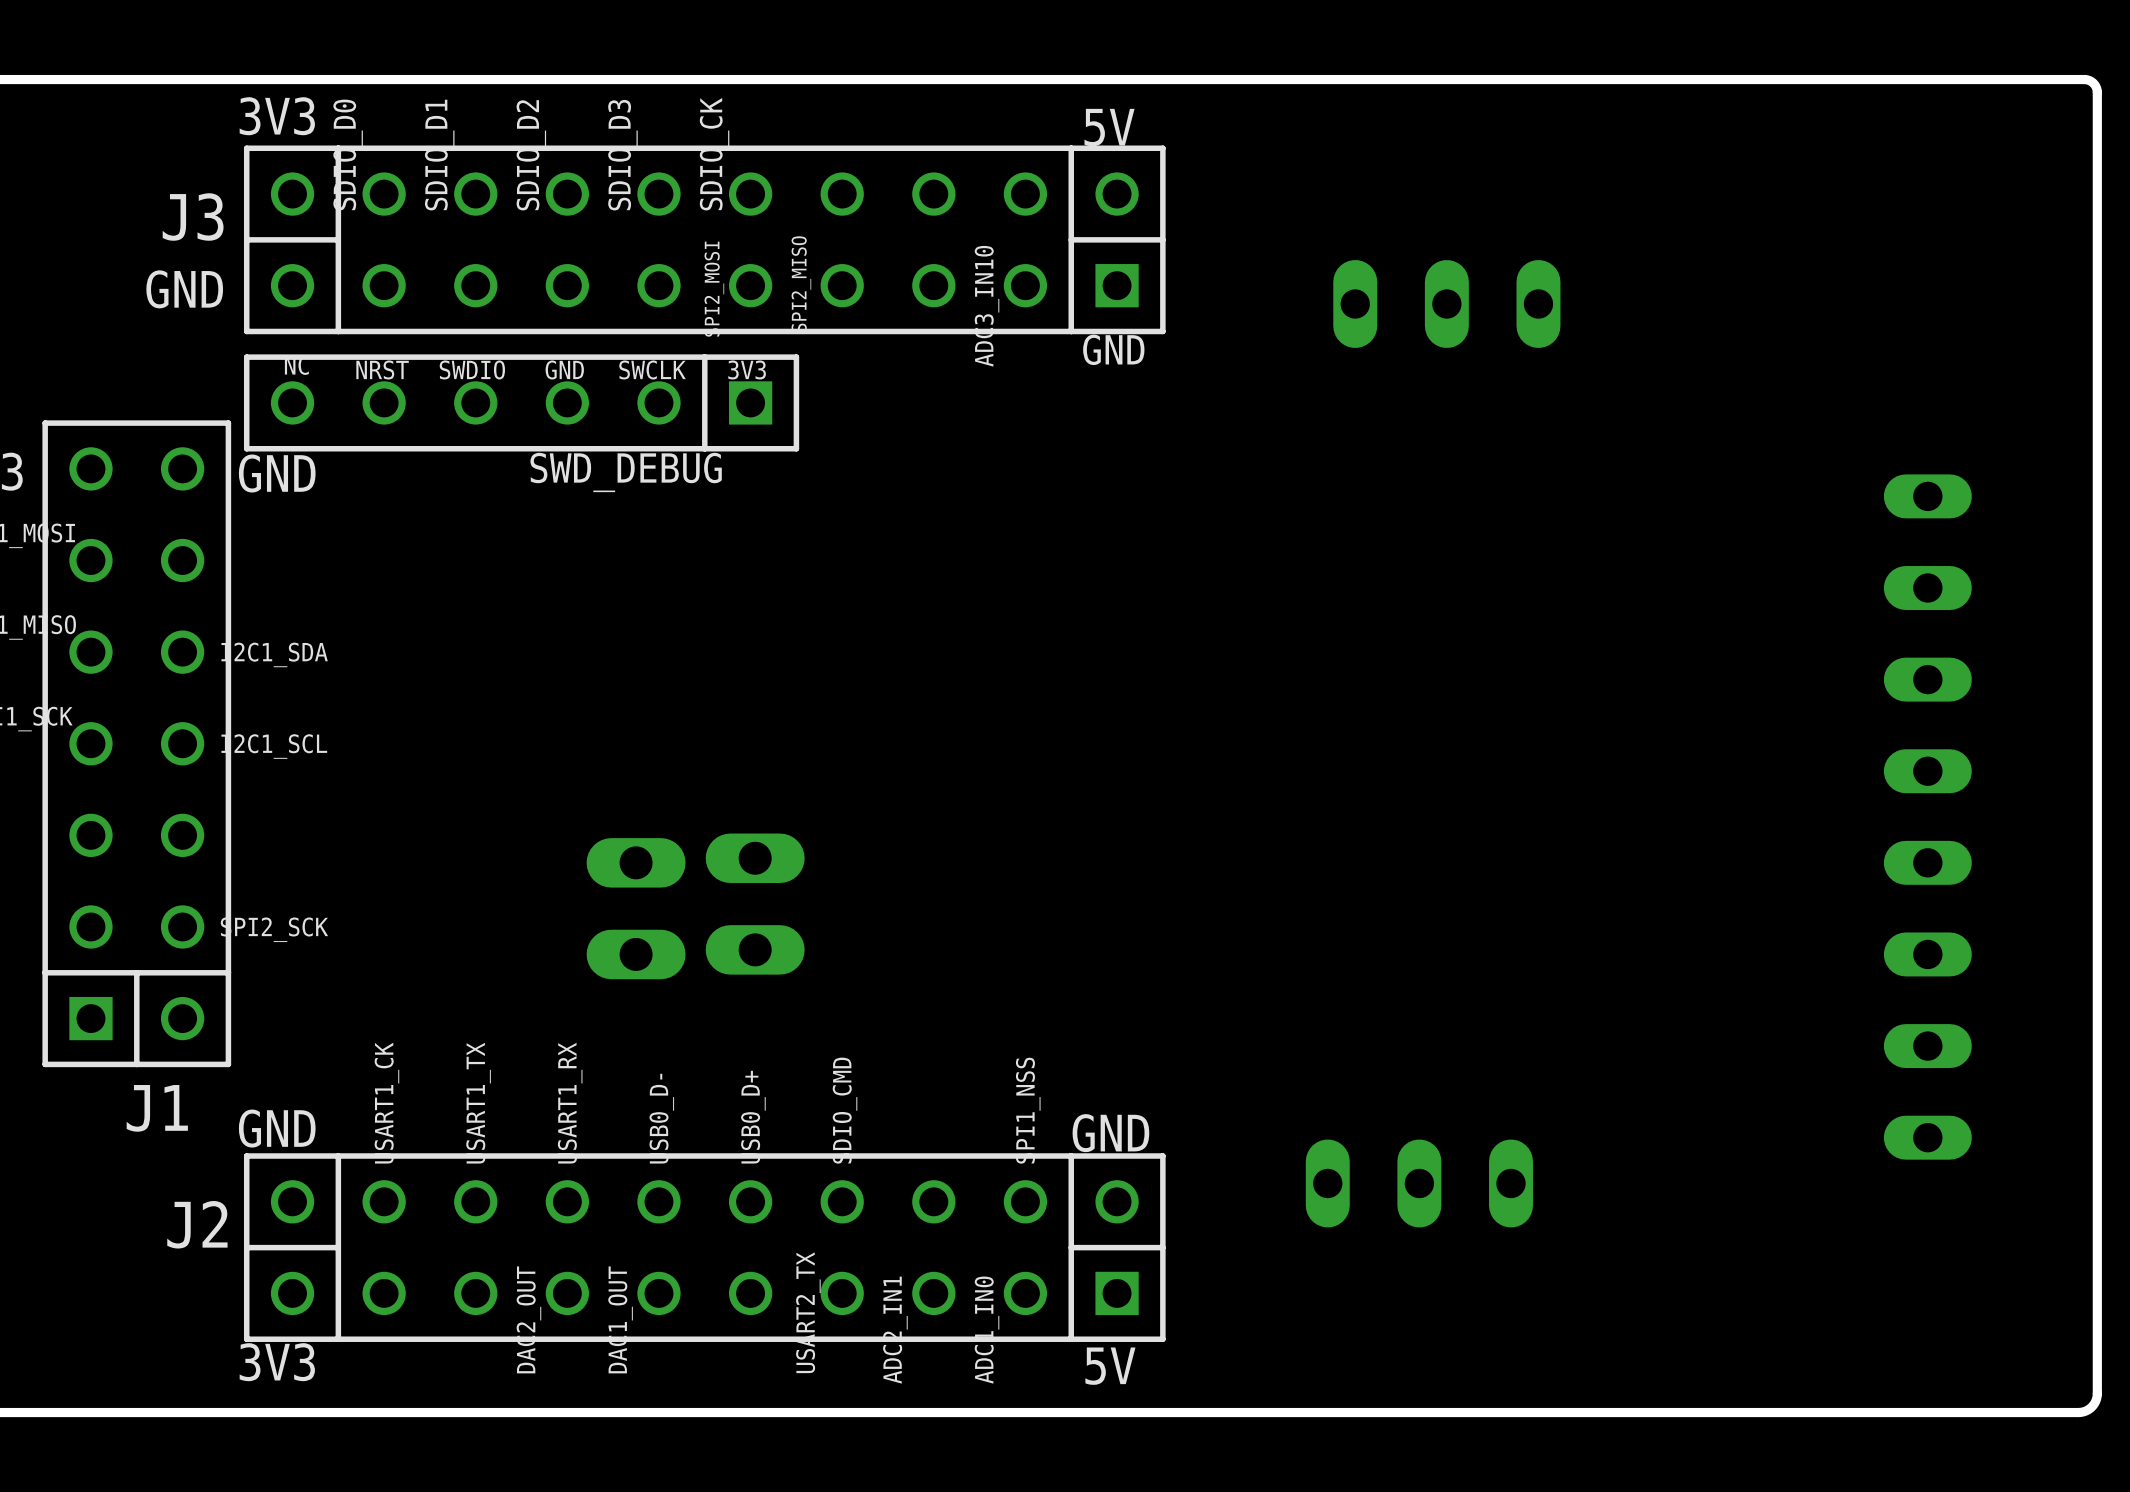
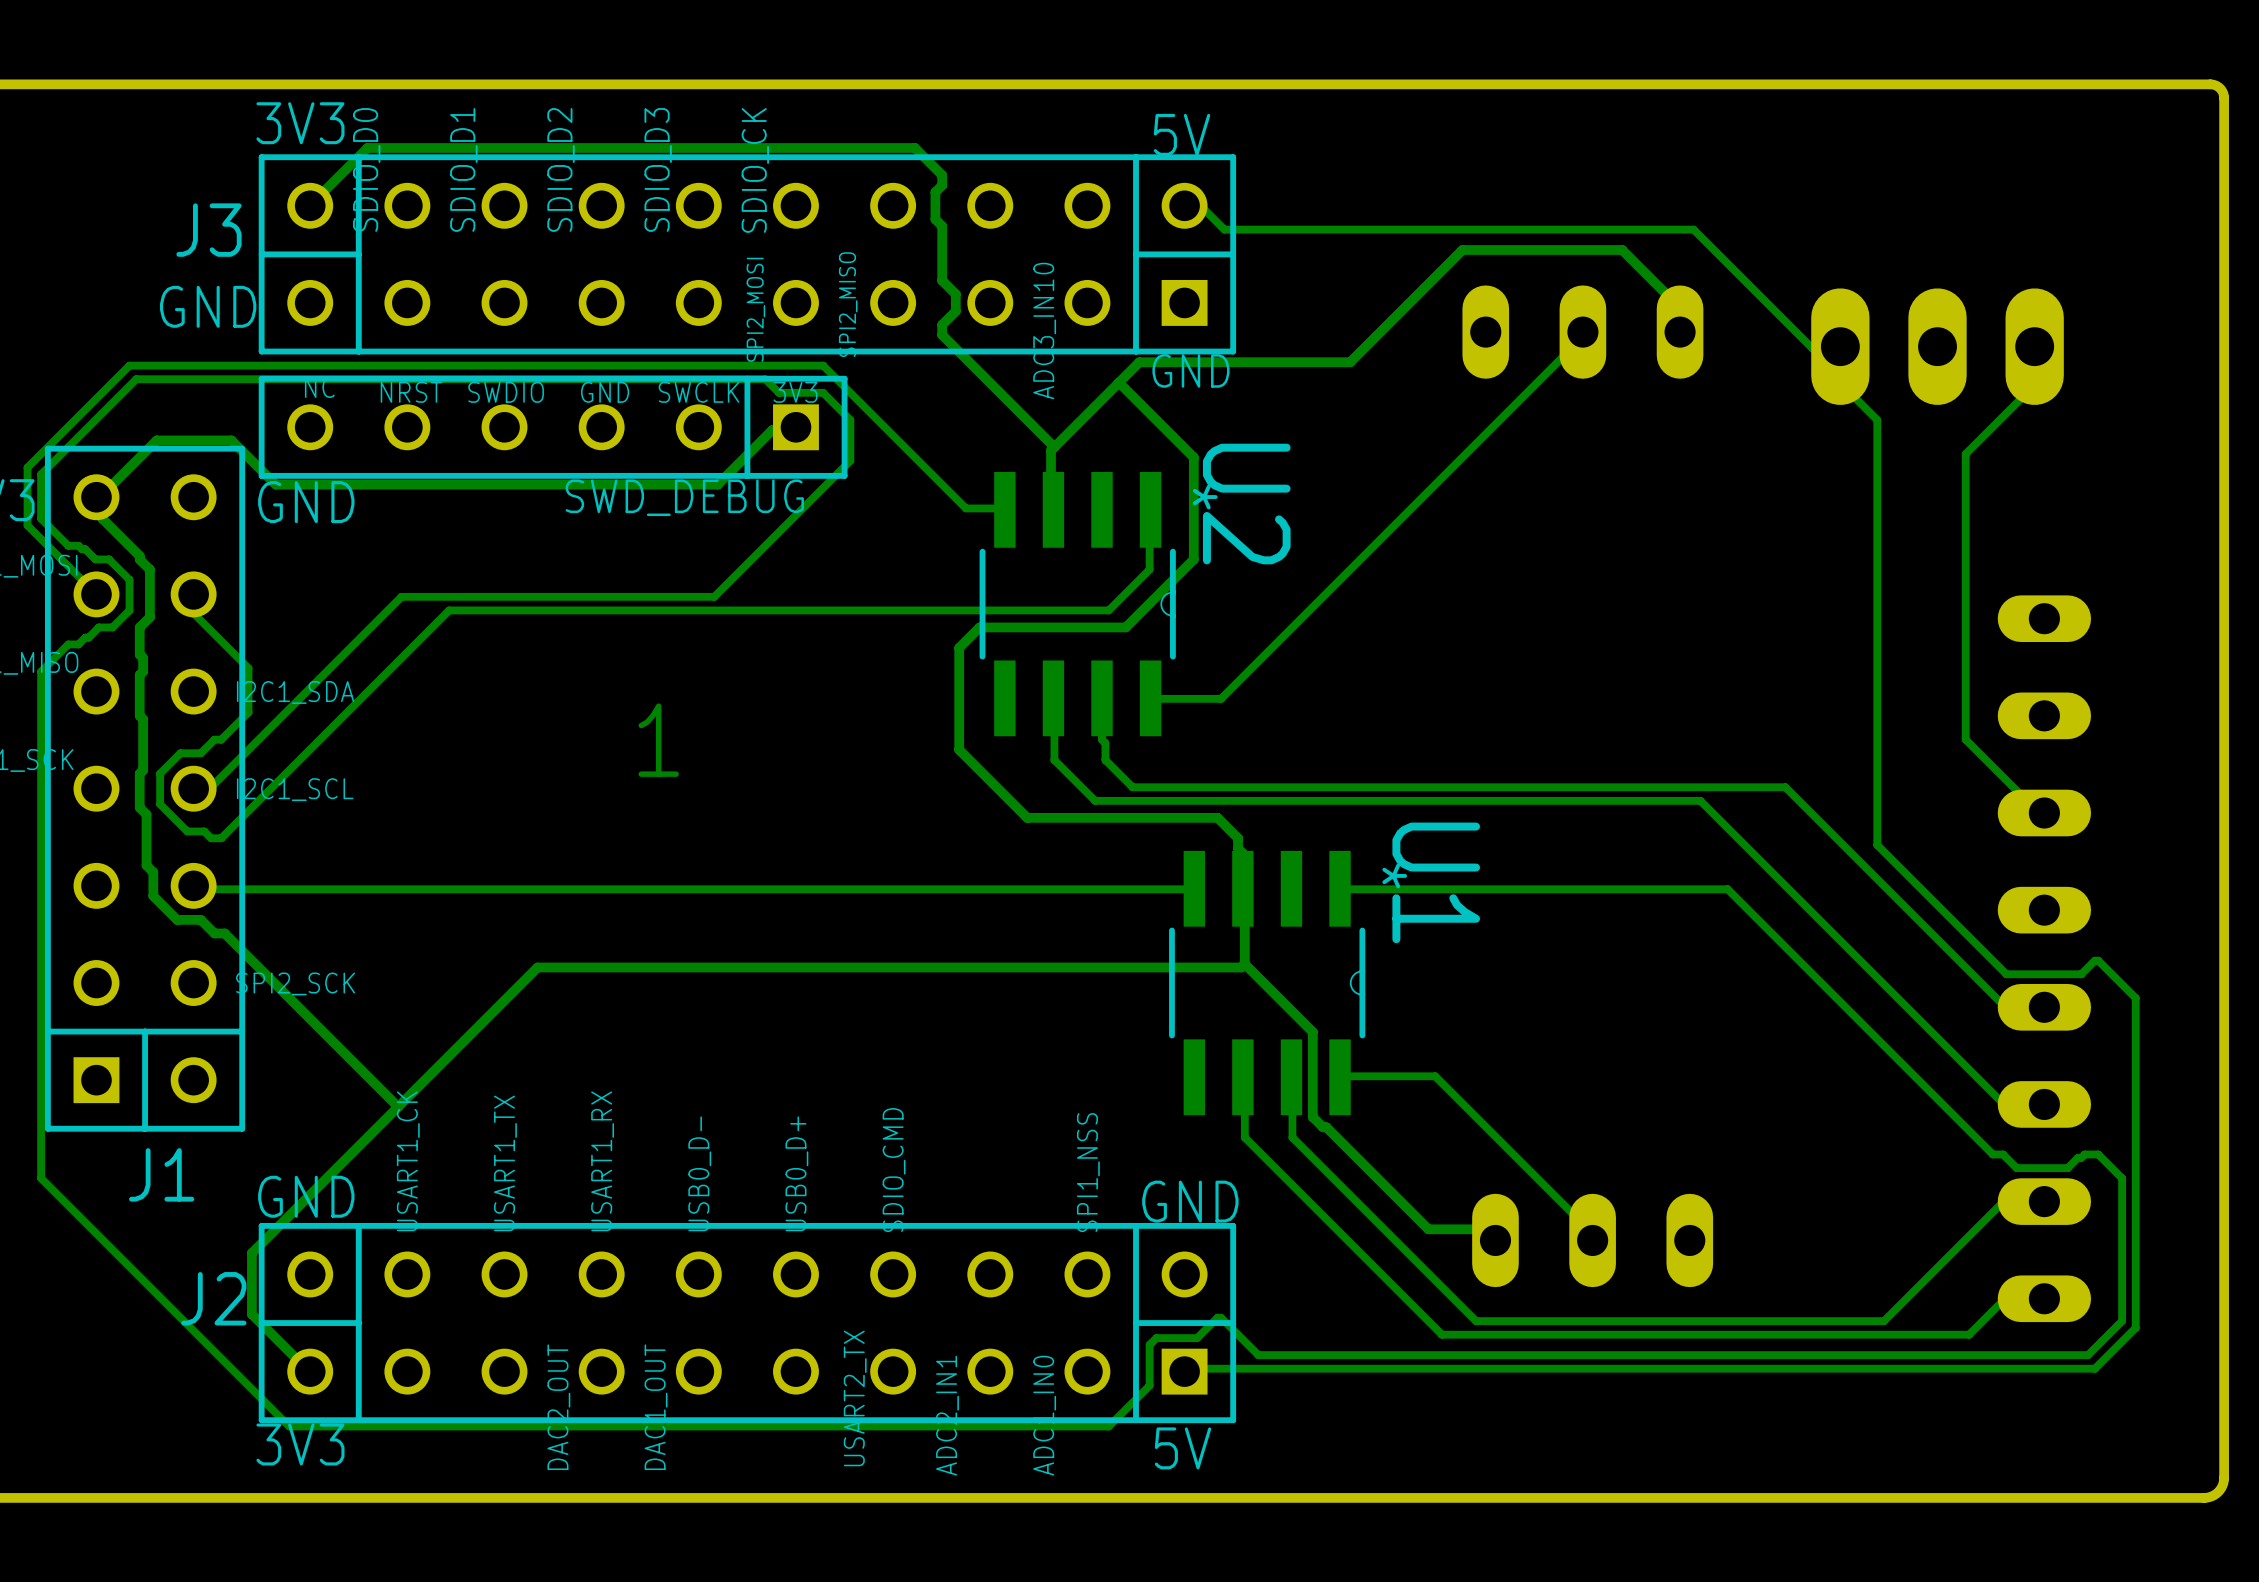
track: none -> (310, 205) (313, 205) (323, 195) (323, 192) (367, 147) (914, 147) (942, 175) (942, 185) (935, 192) (935, 219) (942, 226) (942, 280) (955, 294) (955, 311) (942, 324) (942, 335) (1054, 447)
track: none -> (1184, 205) (1200, 205) (1224, 229) (1693, 229) (1812, 348) (1839, 348) (1840, 346) (1843, 348) (1843, 386) (1877, 420) (1877, 845) (2006, 974) (2081, 974) (2094, 960) (2098, 960) (2135, 998) (2135, 1327) (2094, 1368) (1187, 1368) (1184, 1371)
part position: (1446, 304) -> (1582, 332)
track: none -> (1582, 332) (1584, 335) (1221, 698) (1150, 698)
track: none -> (1680, 332) (1680, 307) (1622, 249) (1462, 249) (1350, 362) (1139, 362) (1051, 450) (1051, 508) (1053, 509)
part: none -> (1937, 346)
track: none -> (2034, 346) (2033, 386) (1965, 454) (1965, 739) (2037, 811) (2043, 811) (2044, 812)
track: none -> (1119, 382) (1193, 457) (1193, 559) (1125, 627) (979, 627) (959, 647) (959, 749) (1027, 817) (1217, 817) (1238, 838) (1238, 848) (1244, 855) (1244, 885) (1242, 888) (1244, 889) (1244, 964)
track: none -> (795, 427) (795, 430) (772, 430) (717, 484) (275, 484) (231, 440) (156, 440) (98, 498) (96, 497) (102, 501) (102, 518) (139, 556) (139, 559) (149, 569) (149, 617) (139, 627) (139, 654) (143, 658) (143, 671) (139, 675) (139, 715) (143, 719) (143, 770) (139, 773) (139, 807) (146, 814) (146, 865) (153, 872) (153, 896) (177, 919) (200, 919) (214, 933) (224, 933) (398, 1106)
track: none -> (1004, 509) (965, 508) (823, 365) (129, 365) (27, 467) (27, 525) (96, 594)
track: none -> (1150, 509) (1149, 569) (1108, 610) (449, 610) (221, 838) (211, 838) (204, 831) (187, 831) (160, 804) (160, 773) (180, 753) (200, 753) (214, 739) (221, 739) (248, 712) (248, 668) (194, 613) (193, 594)
U2: none -> (1077, 604)
track: none -> (1053, 698) (1054, 760) (1095, 800) (1700, 800) (2003, 1103) (2044, 1104)
track: none -> (1102, 698) (1102, 739) (1105, 743) (1105, 760) (1132, 787) (1785, 787) (2003, 1004) (2043, 1004) (2044, 1007)
text: none -> 1 (658, 740)
track: none -> (193, 788) (211, 787) (401, 596) (714, 596) (850, 460) (850, 420) (823, 392) (778, 392) (765, 379) (136, 379) (41, 474) (41, 518) (68, 545) (78, 545) (81, 549) (85, 549) (95, 559) (109, 559) (129, 579) (129, 610) (112, 627) (98, 627) (78, 644) (68, 644) (41, 671) (41, 1178) (289, 1426) (1108, 1426) (1149, 1385) (1149, 1344) (1156, 1338) (1197, 1338) (1217, 1317) (1221, 1317) (1258, 1355) (2088, 1355) (2122, 1321) (2122, 1178) (2098, 1154) (2084, 1154) (2081, 1157) (2077, 1157) (2067, 1168) (2016, 1168) (2003, 1154) (1992, 1154) (1727, 889) (1340, 889)
part position: (1927, 817) -> (2044, 958)
track: none -> (194, 885) (197, 889) (1193, 889)
part: (755, 904) -> none
part: (636, 908) -> none
track: none -> (1244, 964) (1312, 1032) (1312, 1117) (1323, 1127) (1326, 1127) (1428, 1229) (1482, 1229) (1495, 1240)
track: none -> (1244, 964) (1241, 967) (537, 967) (251, 1253) (251, 1314) (296, 1358) (299, 1358) (310, 1371)
U1: none -> (1267, 983)
track: none -> (1242, 1077) (1244, 1079) (1244, 1137) (1442, 1334) (1969, 1334) (2003, 1300) (2043, 1300) (2044, 1298)
track: none -> (1291, 1077) (1292, 1137) (1476, 1321) (1884, 1321) (2003, 1202) (2043, 1202)
track: none -> (1340, 1077) (1435, 1076) (1591, 1232) (1592, 1240)
part position: (1419, 1183) -> (1592, 1240)

